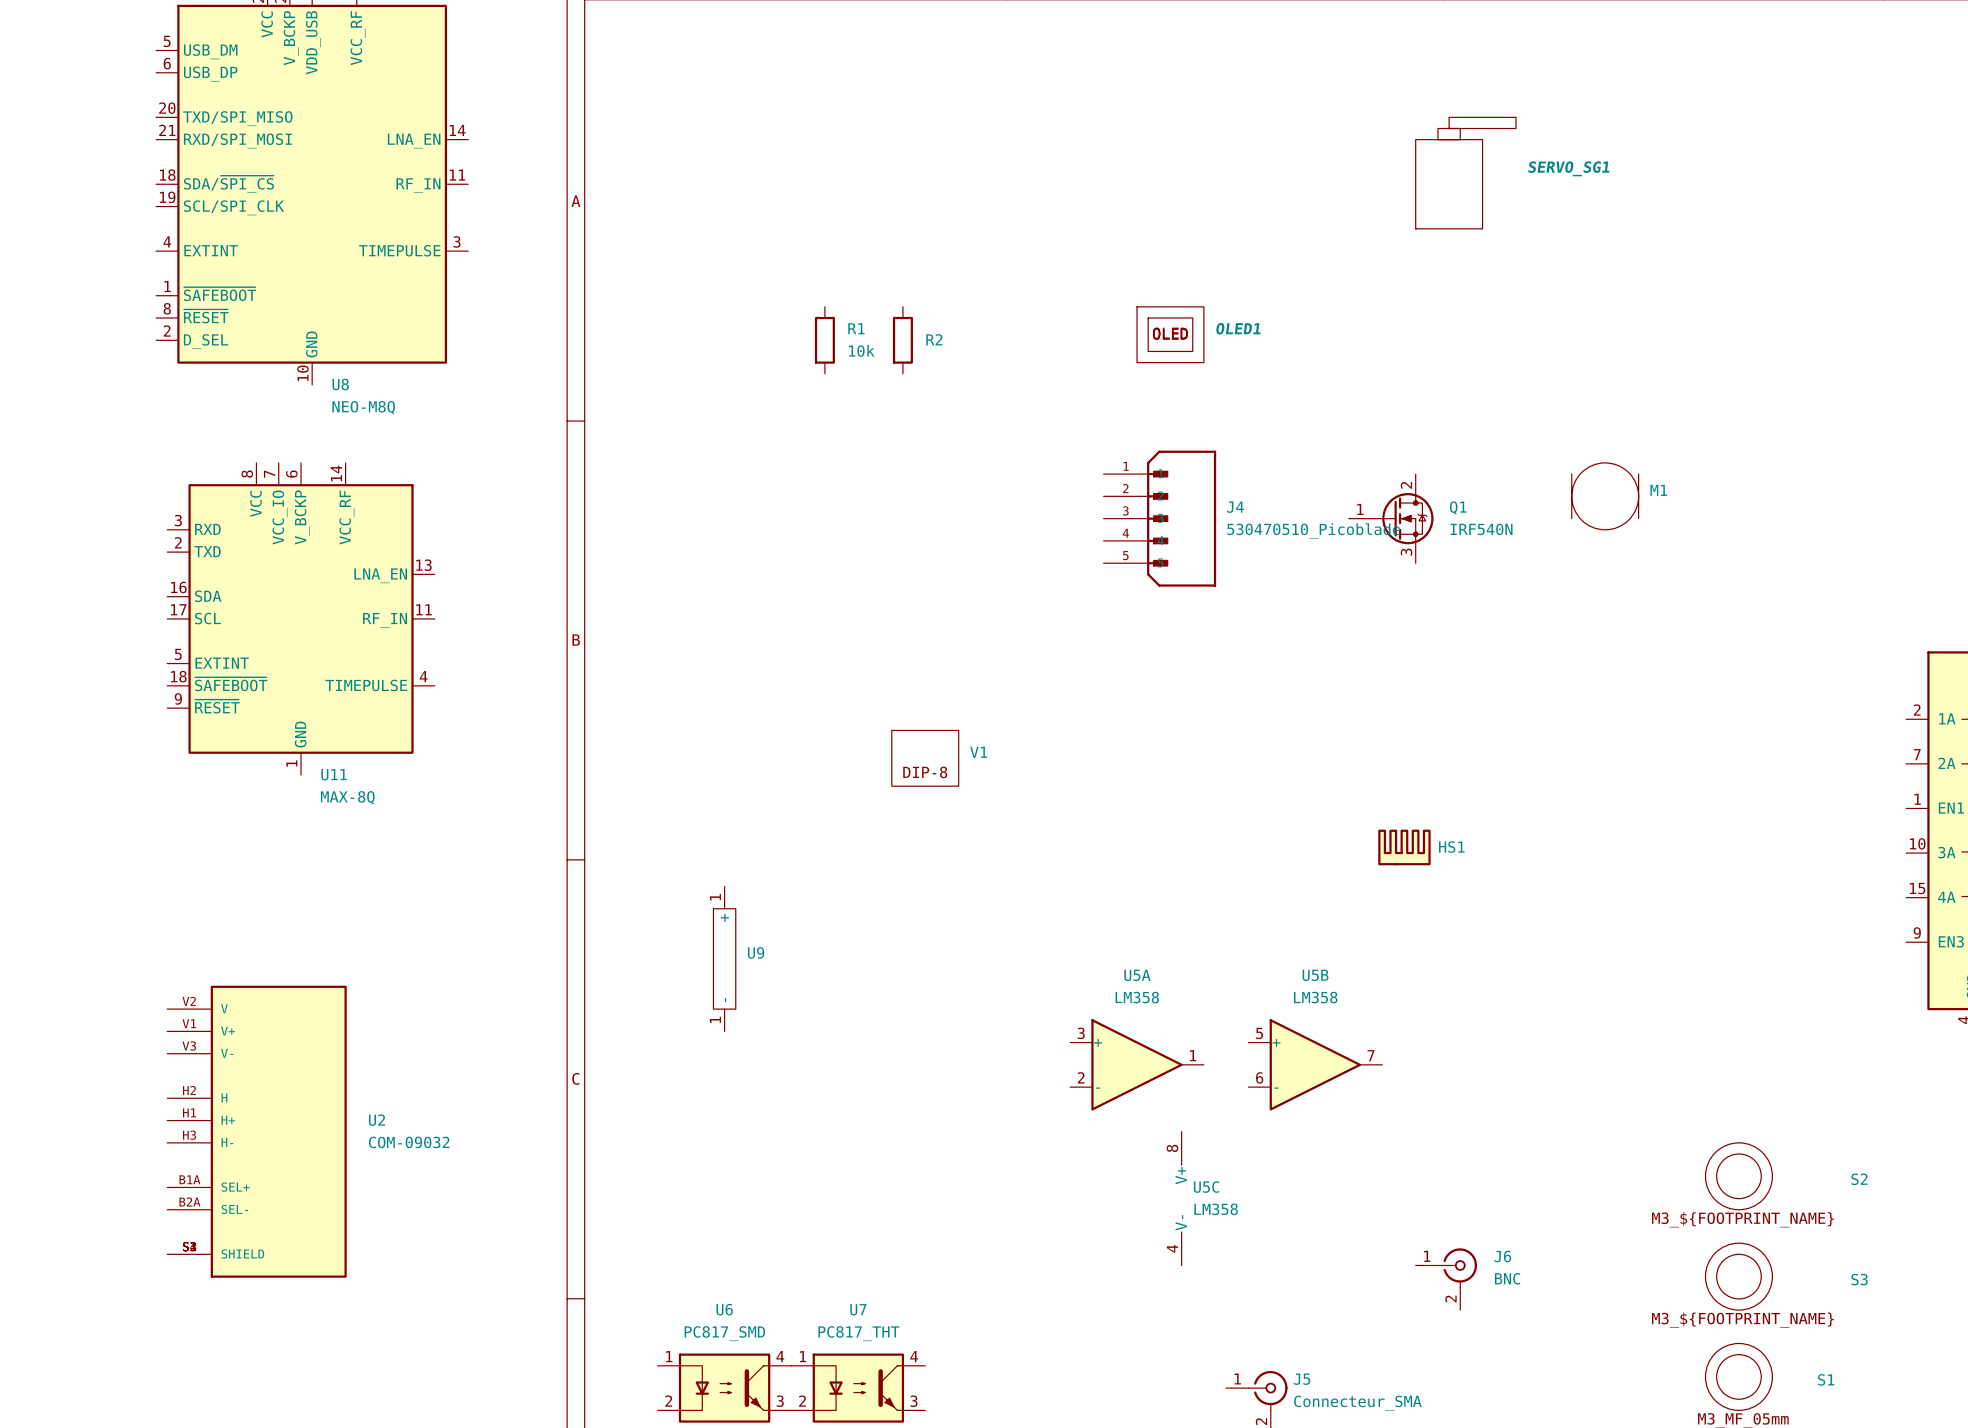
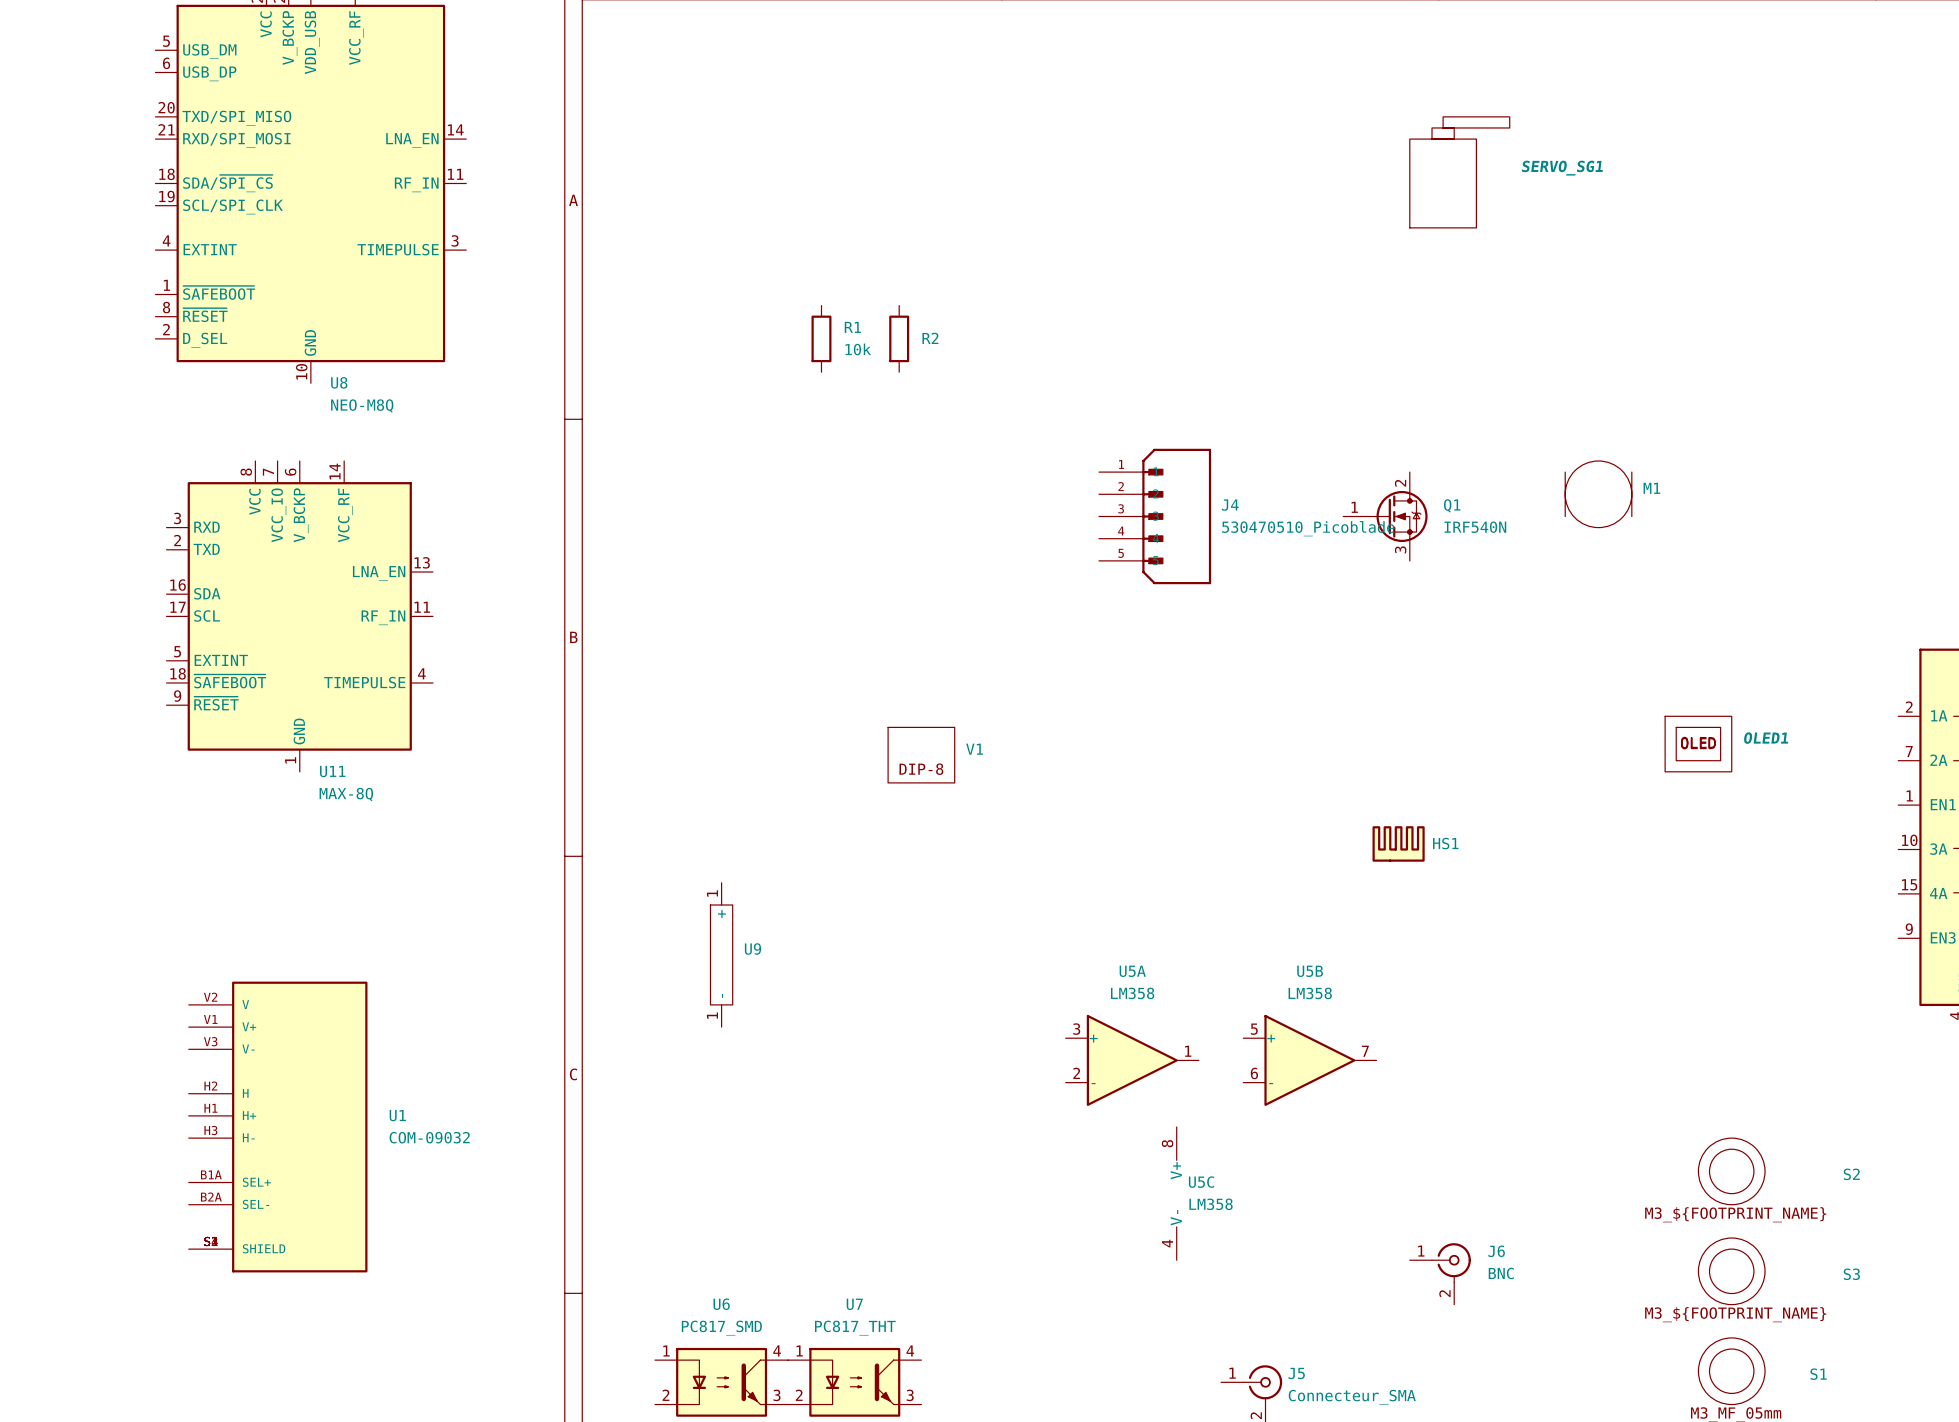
OLED1 position: (1170, 334) -> (1698, 744)
U2: COM-09032 (256, 1131) -> none
U1: none -> COM-09032 (278, 1127)

